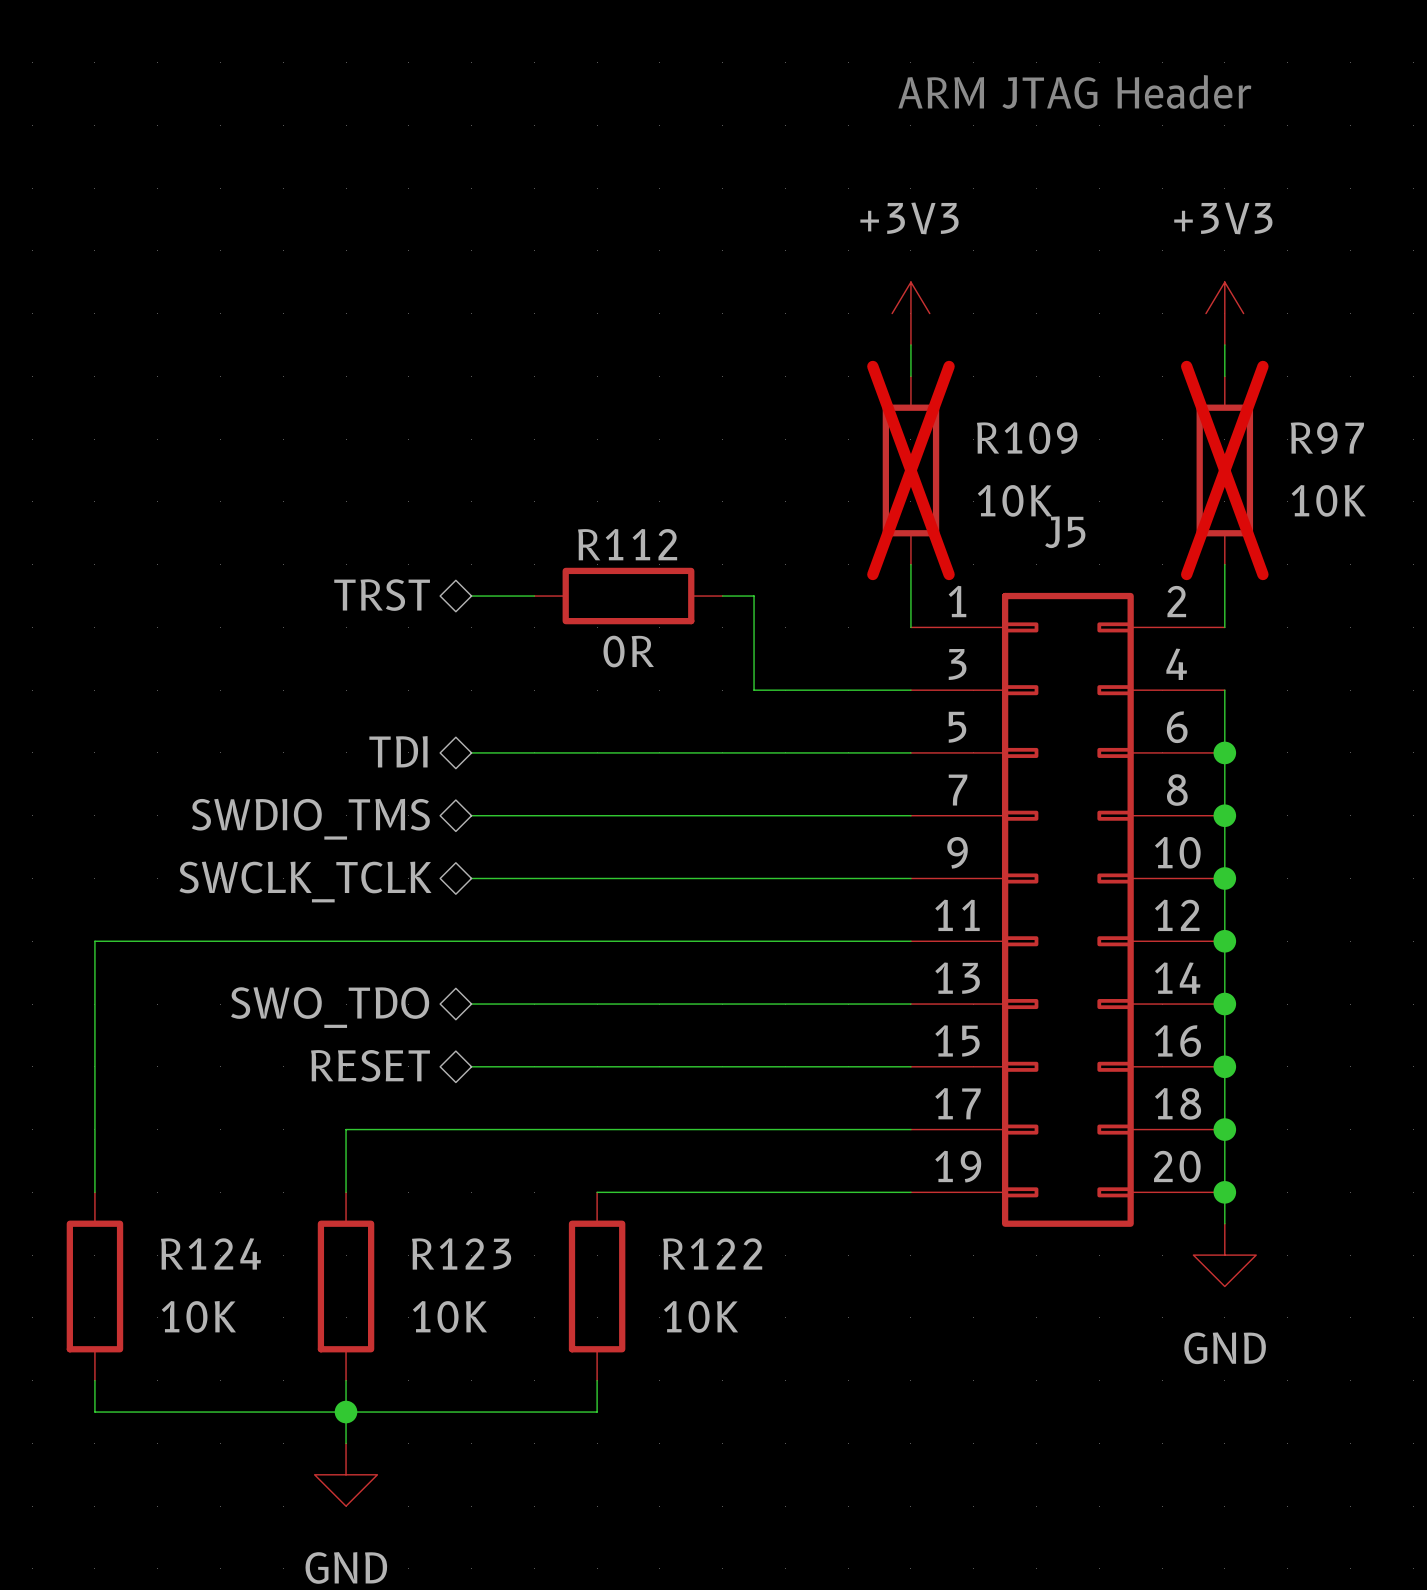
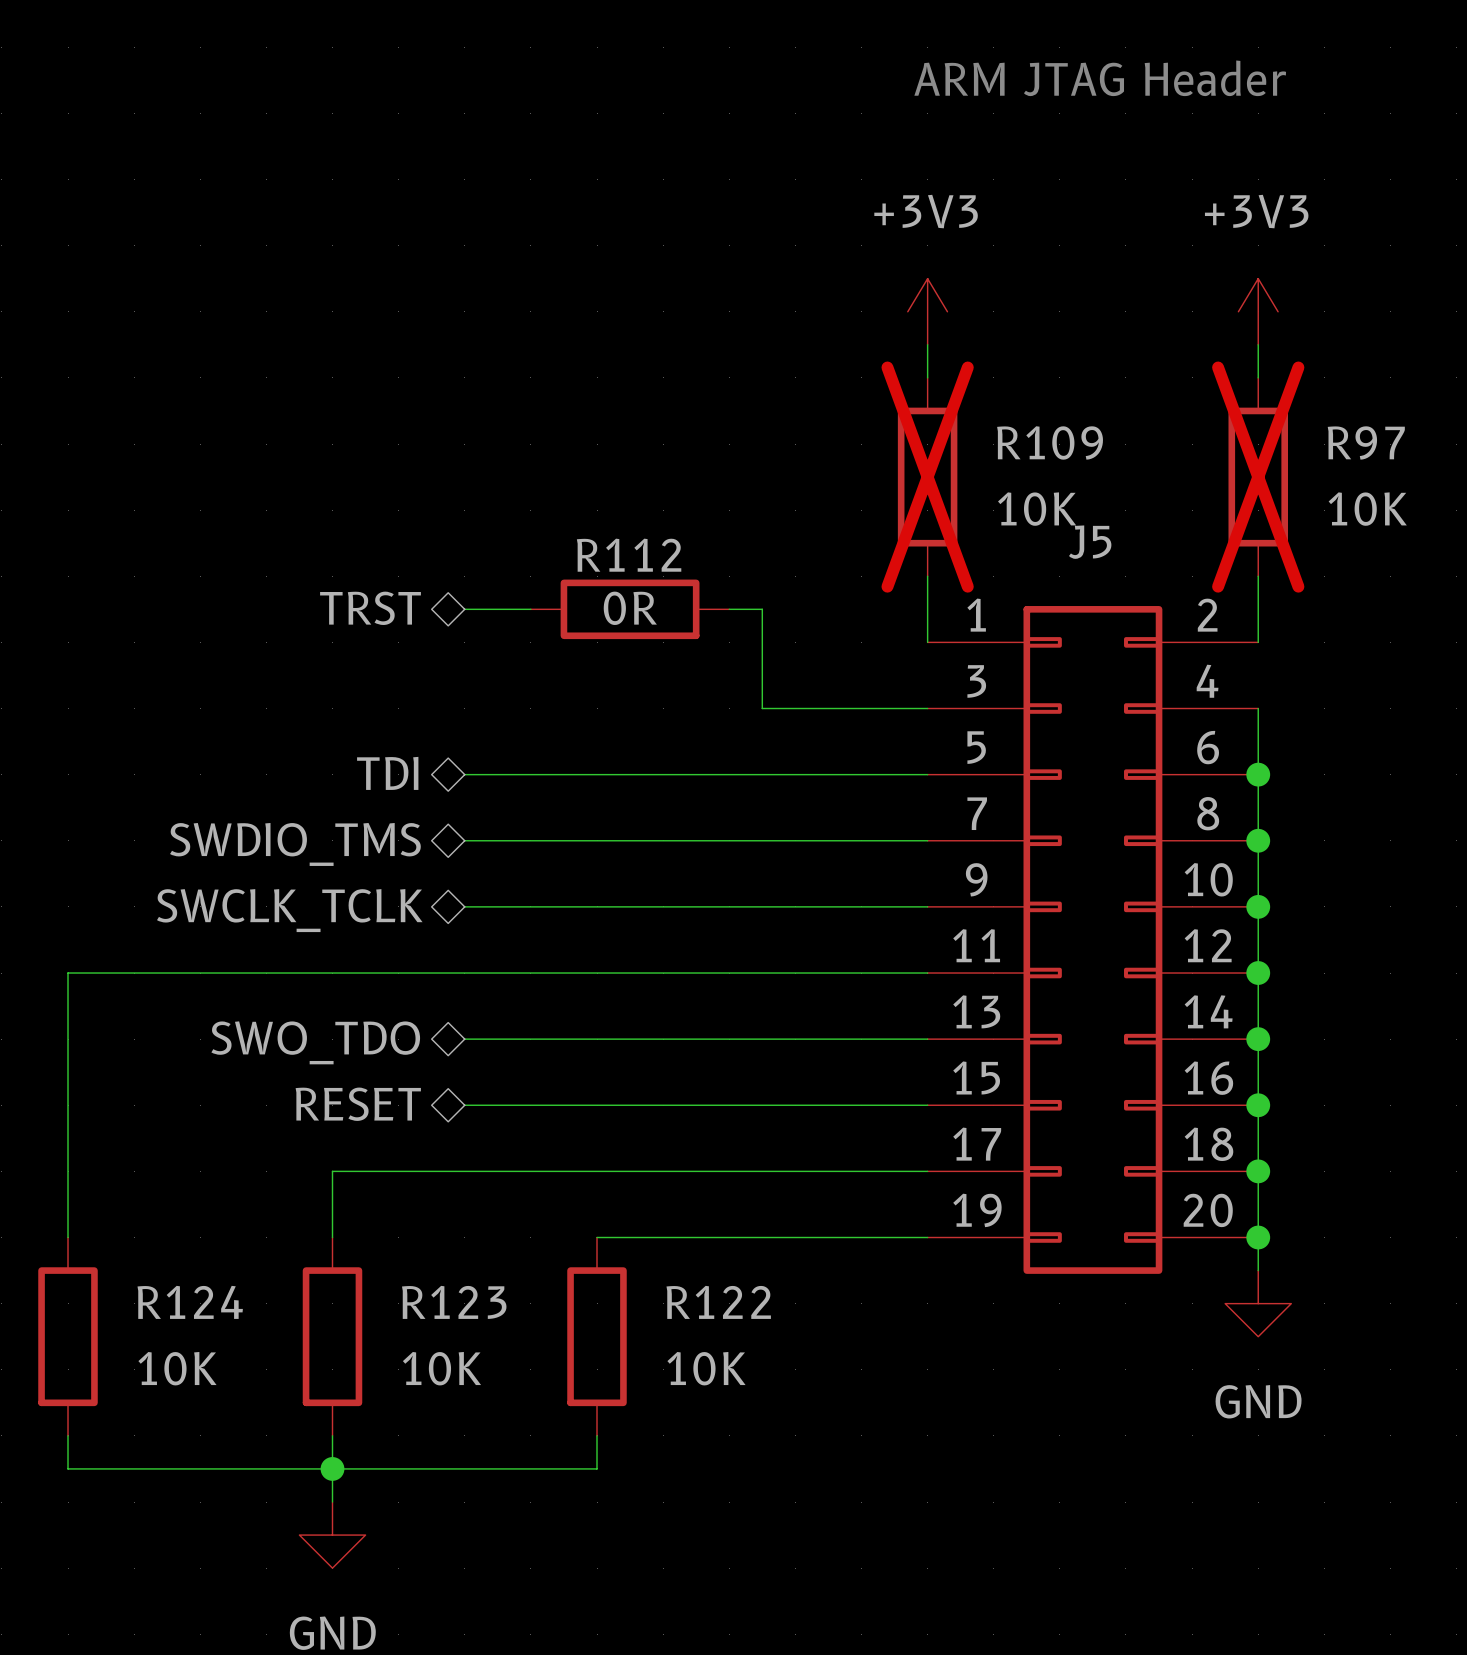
R112 value position: 0R (628, 651) -> 0R (630, 608)

